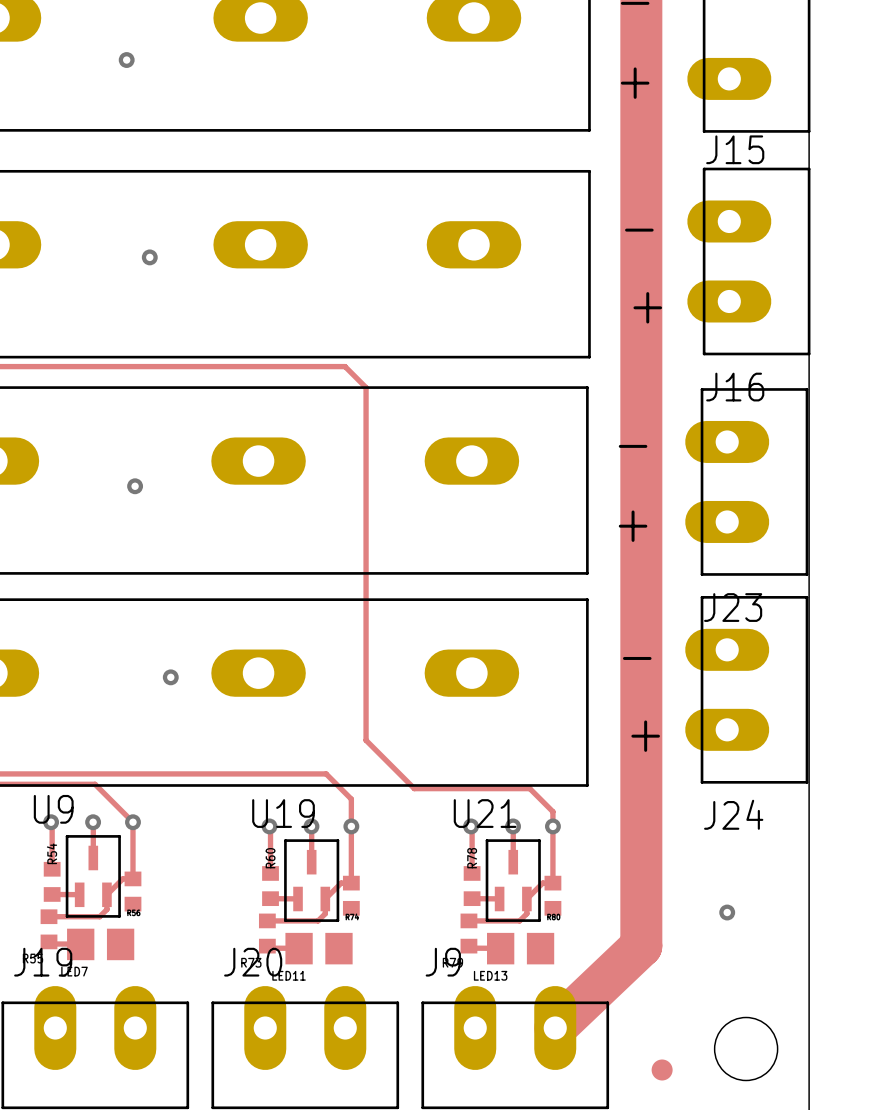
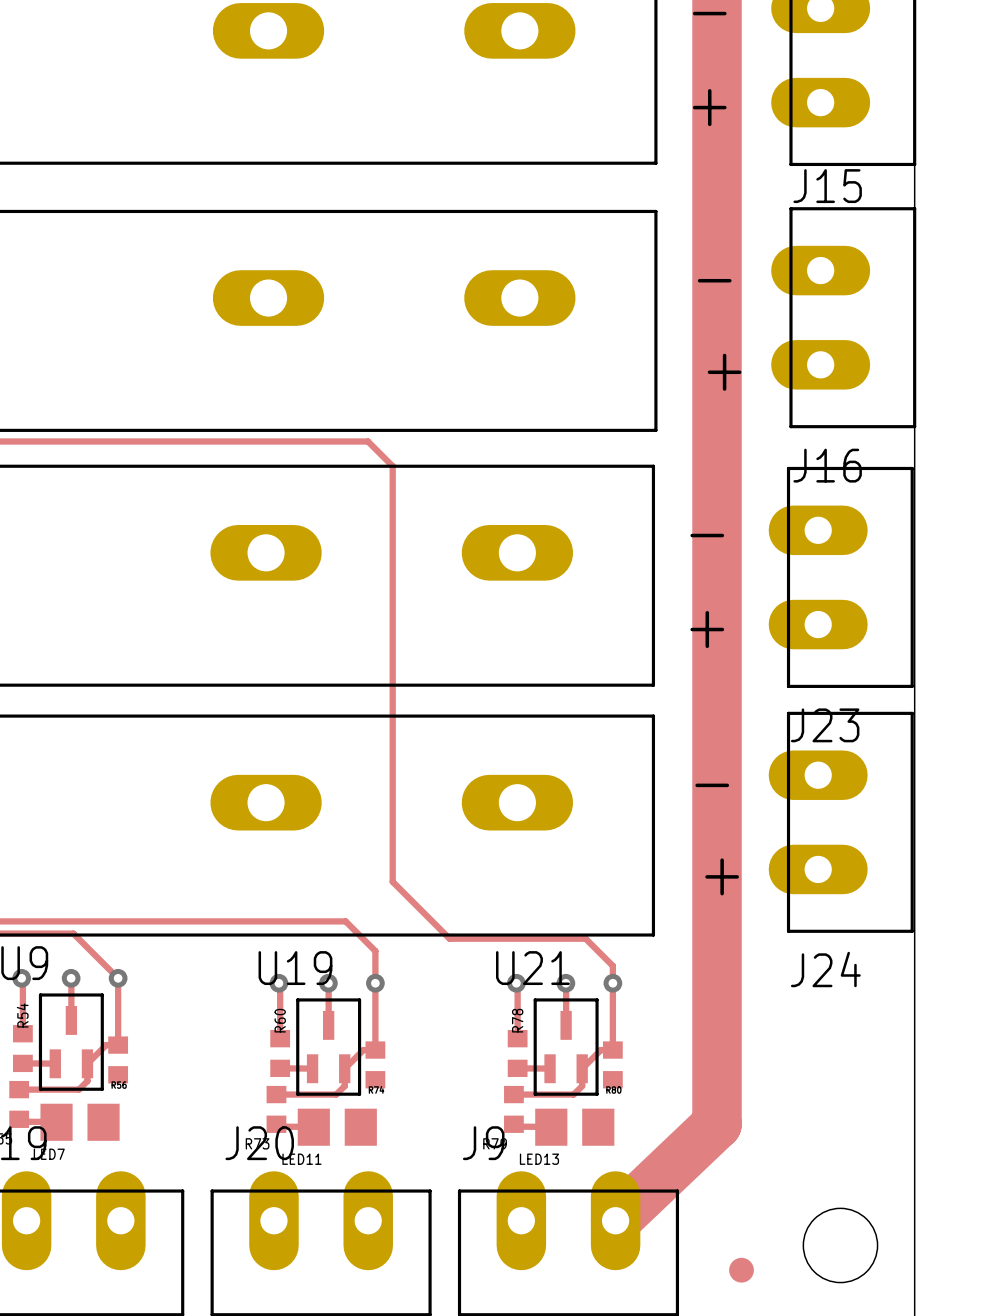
via: (126, 60) -> none
via: (149, 257) -> none
via: (135, 486) -> none
via: (170, 677) -> none
via: (727, 912) -> none

